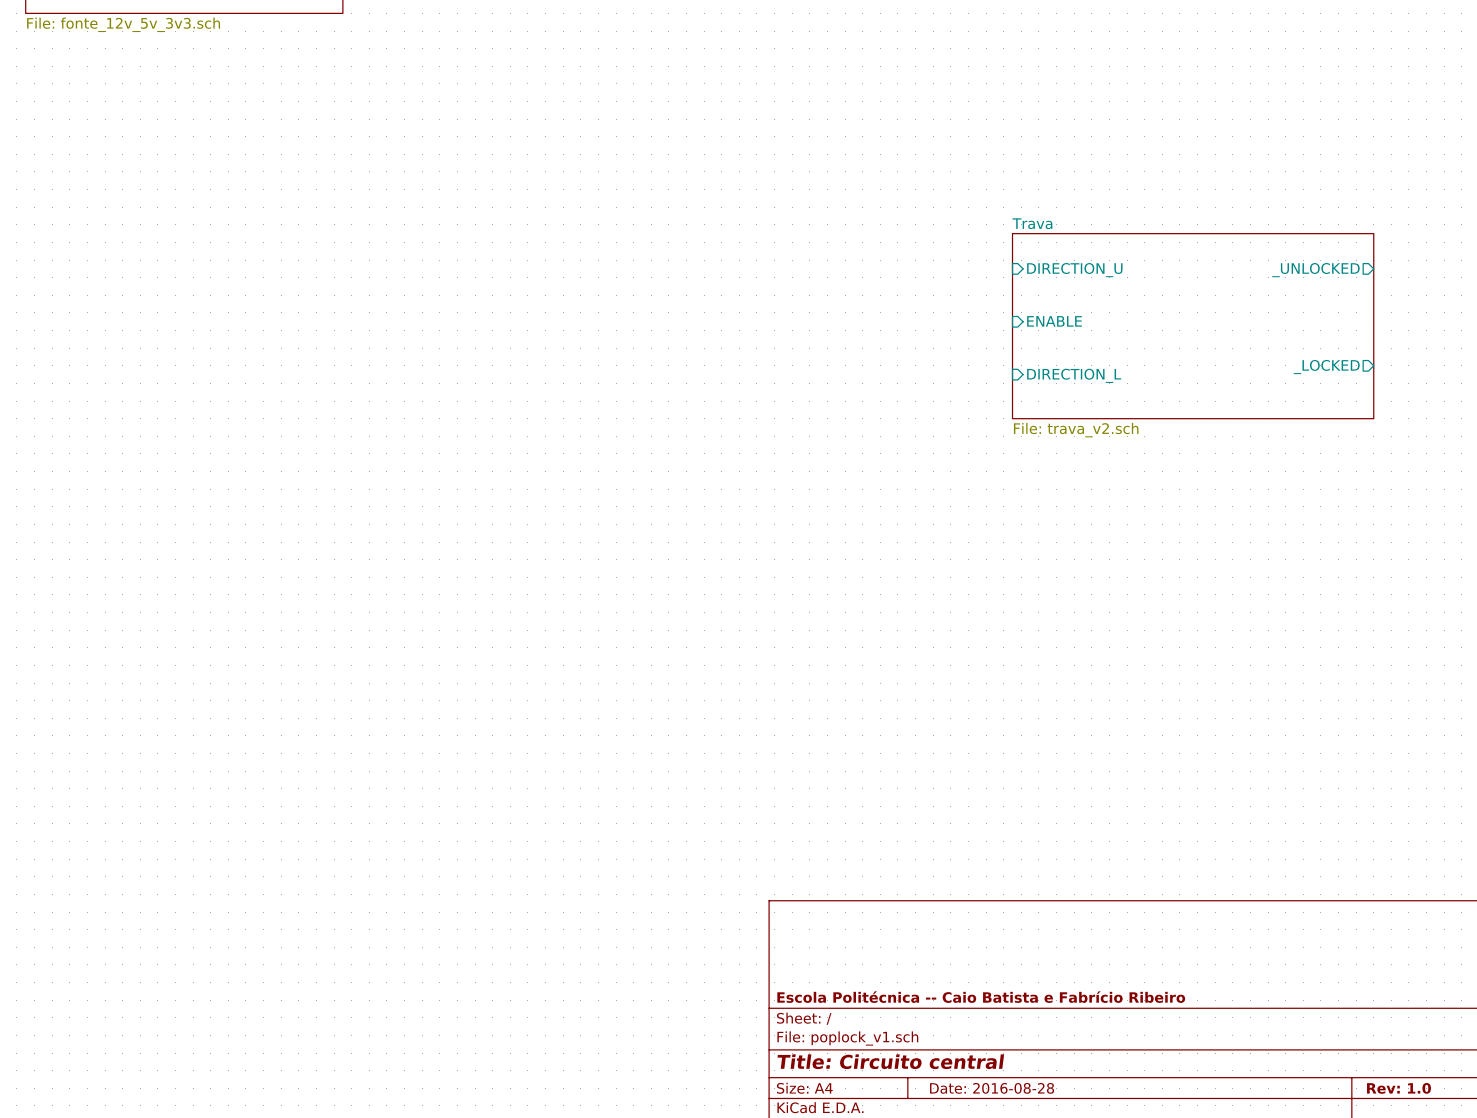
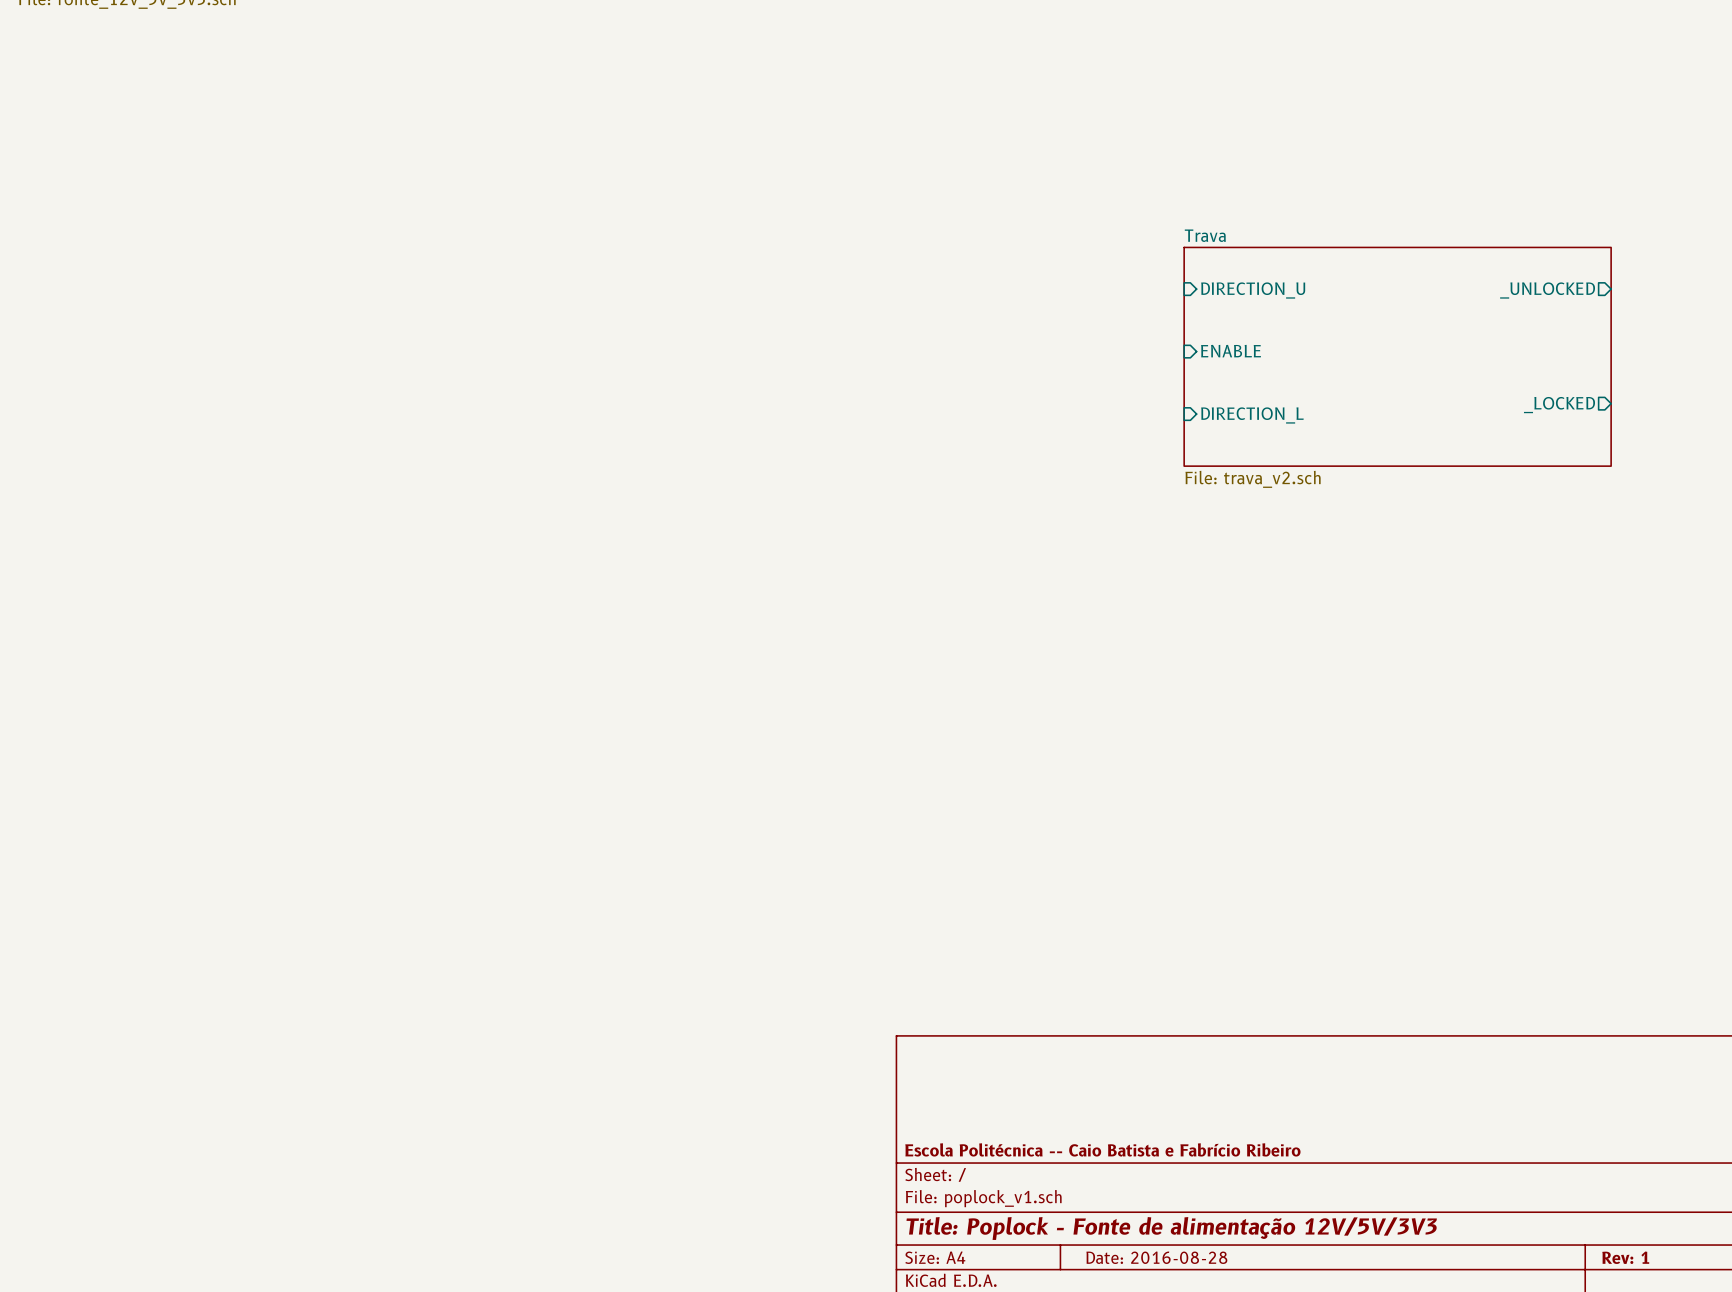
title block: Title: Circuito central (890, 1061) -> Title: Poplock - Fonte de alimentação 12V/5V/3V3 (1171, 1228)
title block: Rev: 1.0 (1399, 1088) -> Rev: 1 (1625, 1257)

